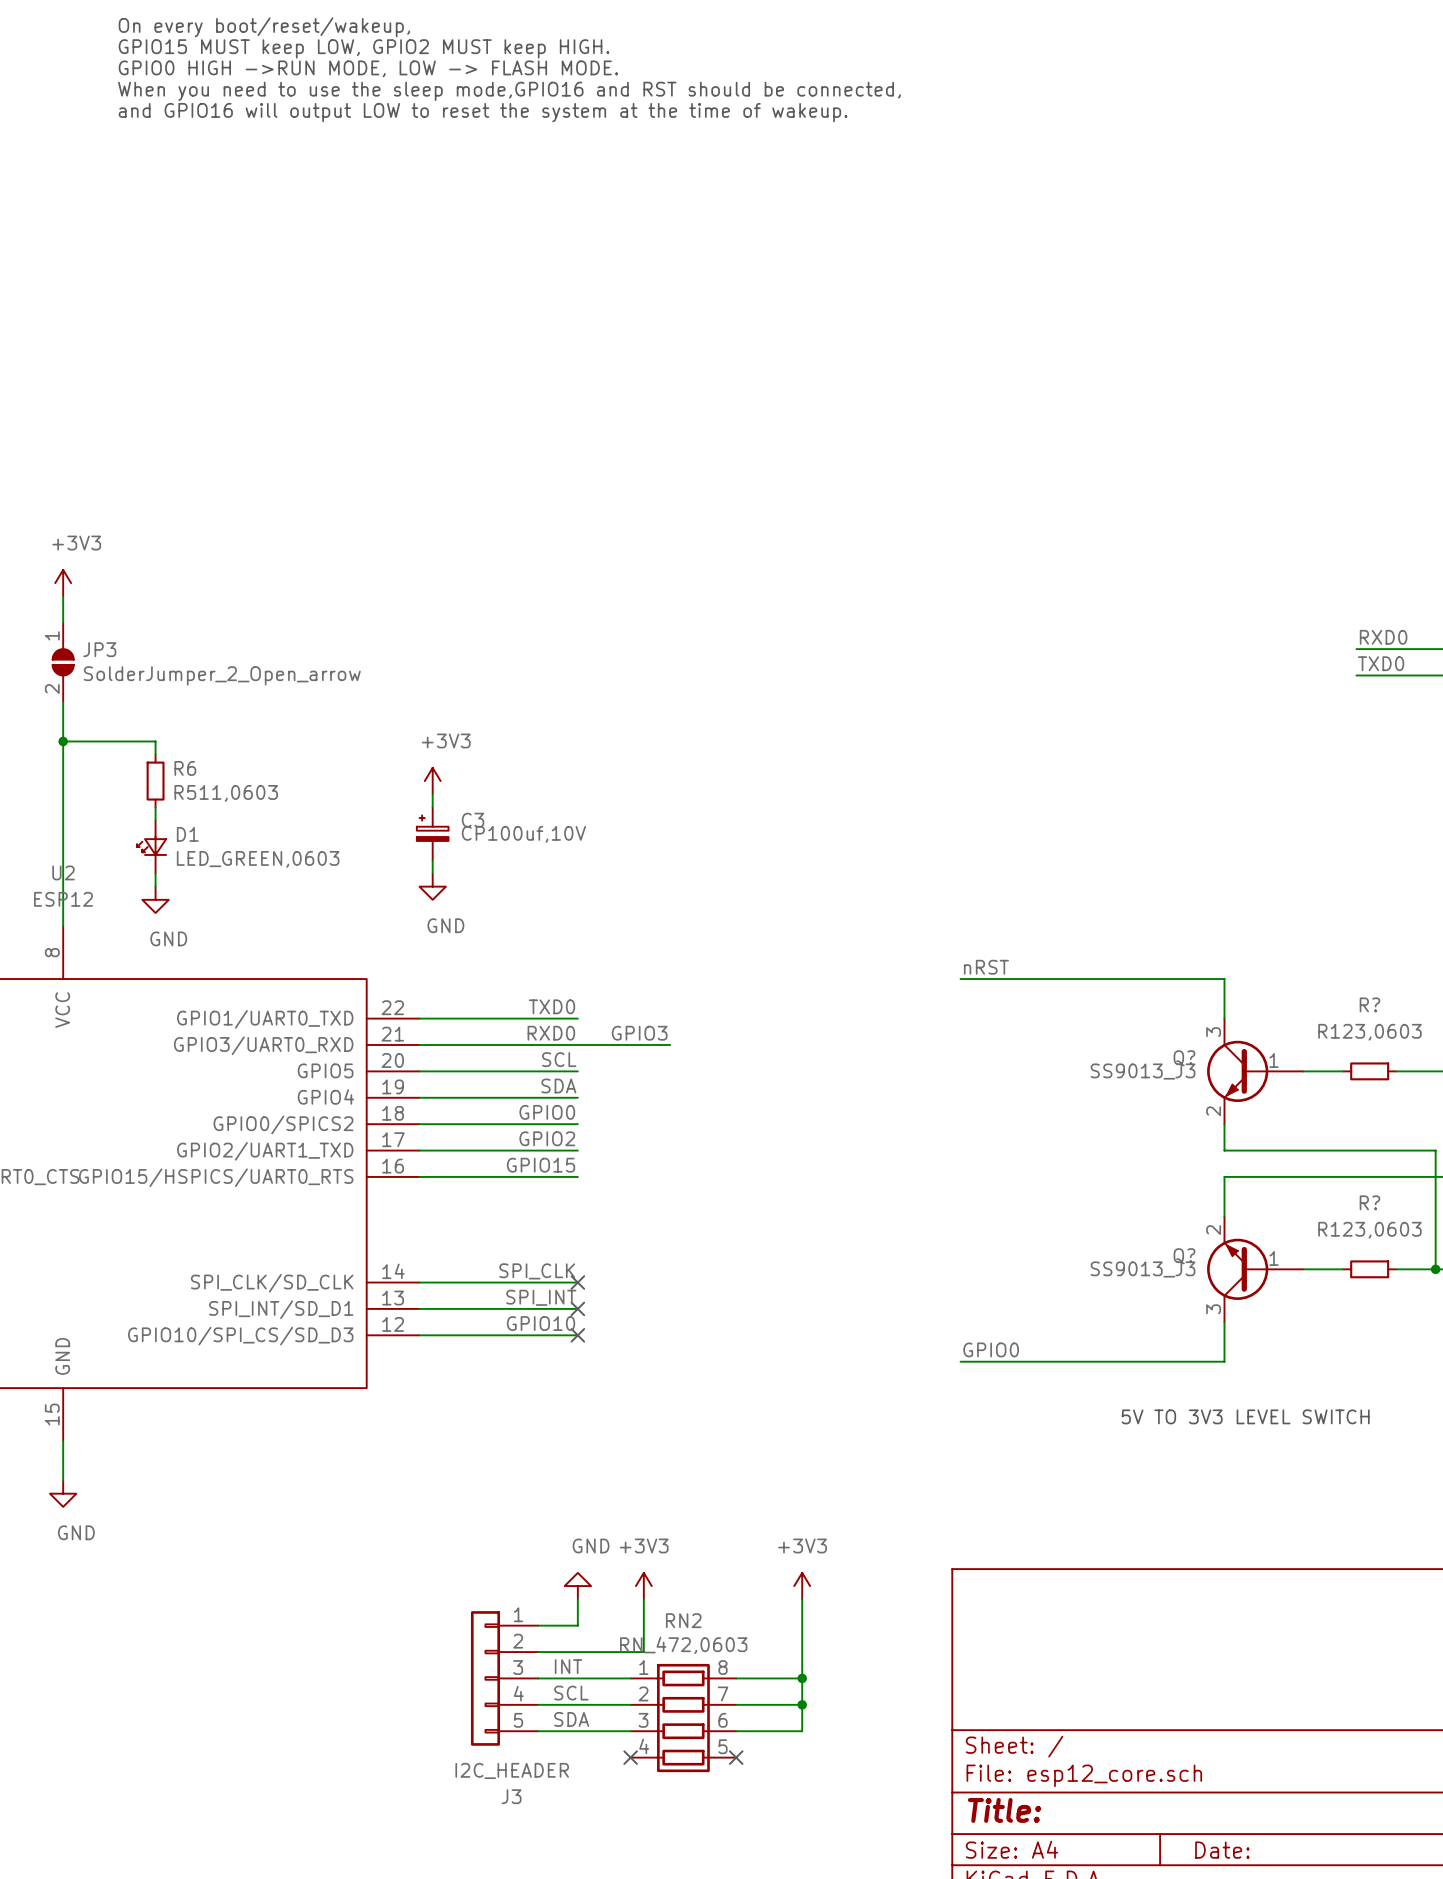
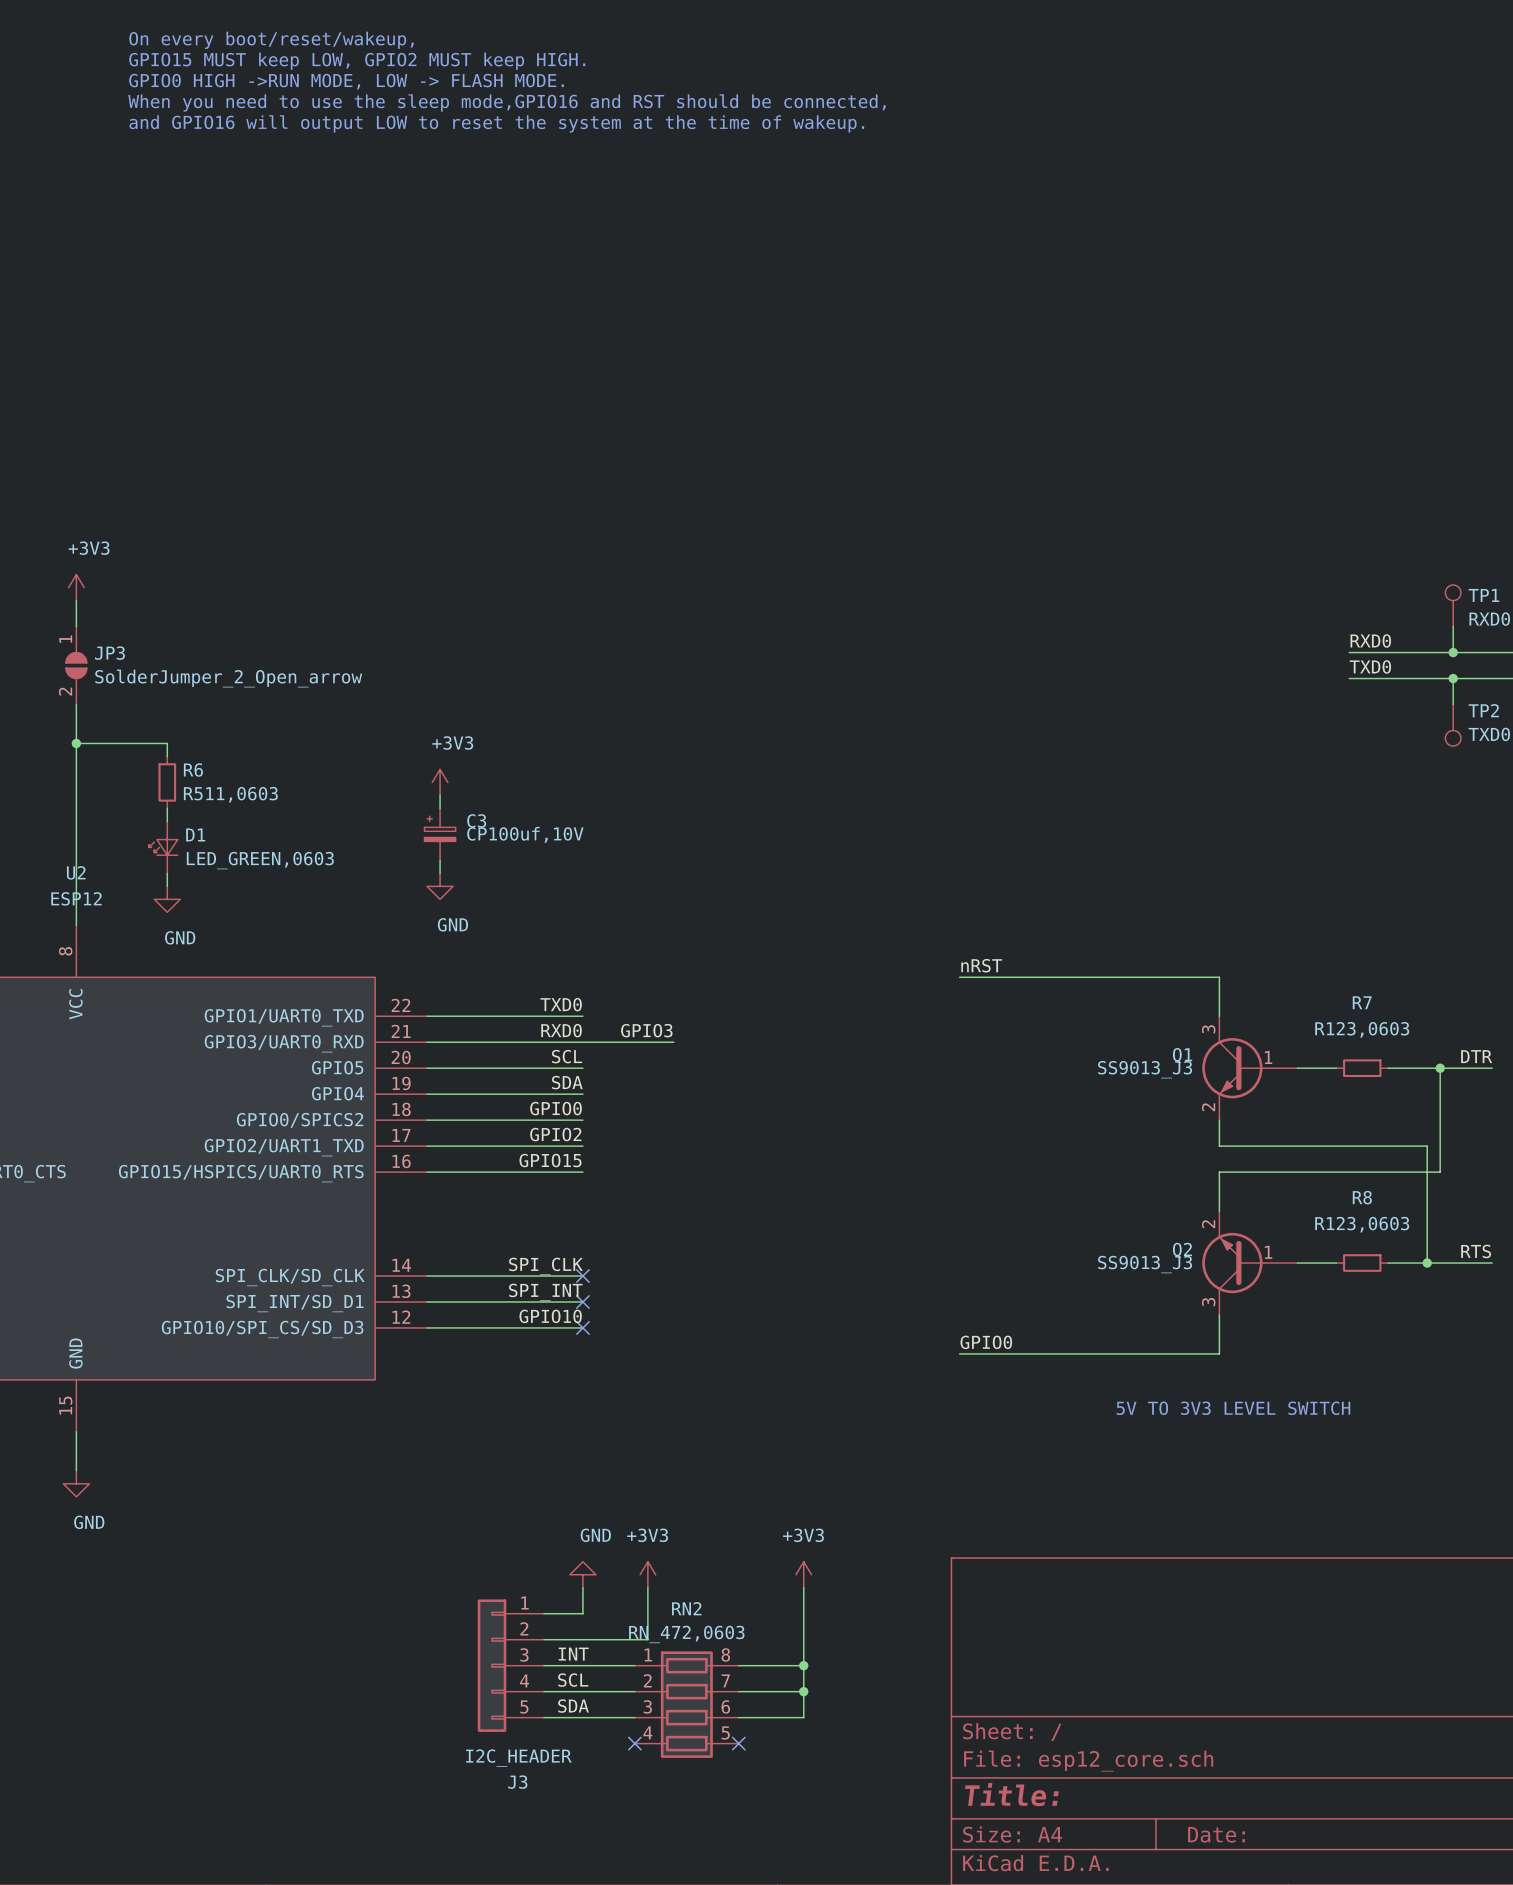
R? name: R? (1369, 1004) -> R7 (1362, 1002)
Q? name: Q? (1184, 1058) -> Q1 (1182, 1055)
R? name: R? (1369, 1202) -> R8 (1362, 1197)
Q? name: Q? (1184, 1256) -> Q2 (1182, 1250)

